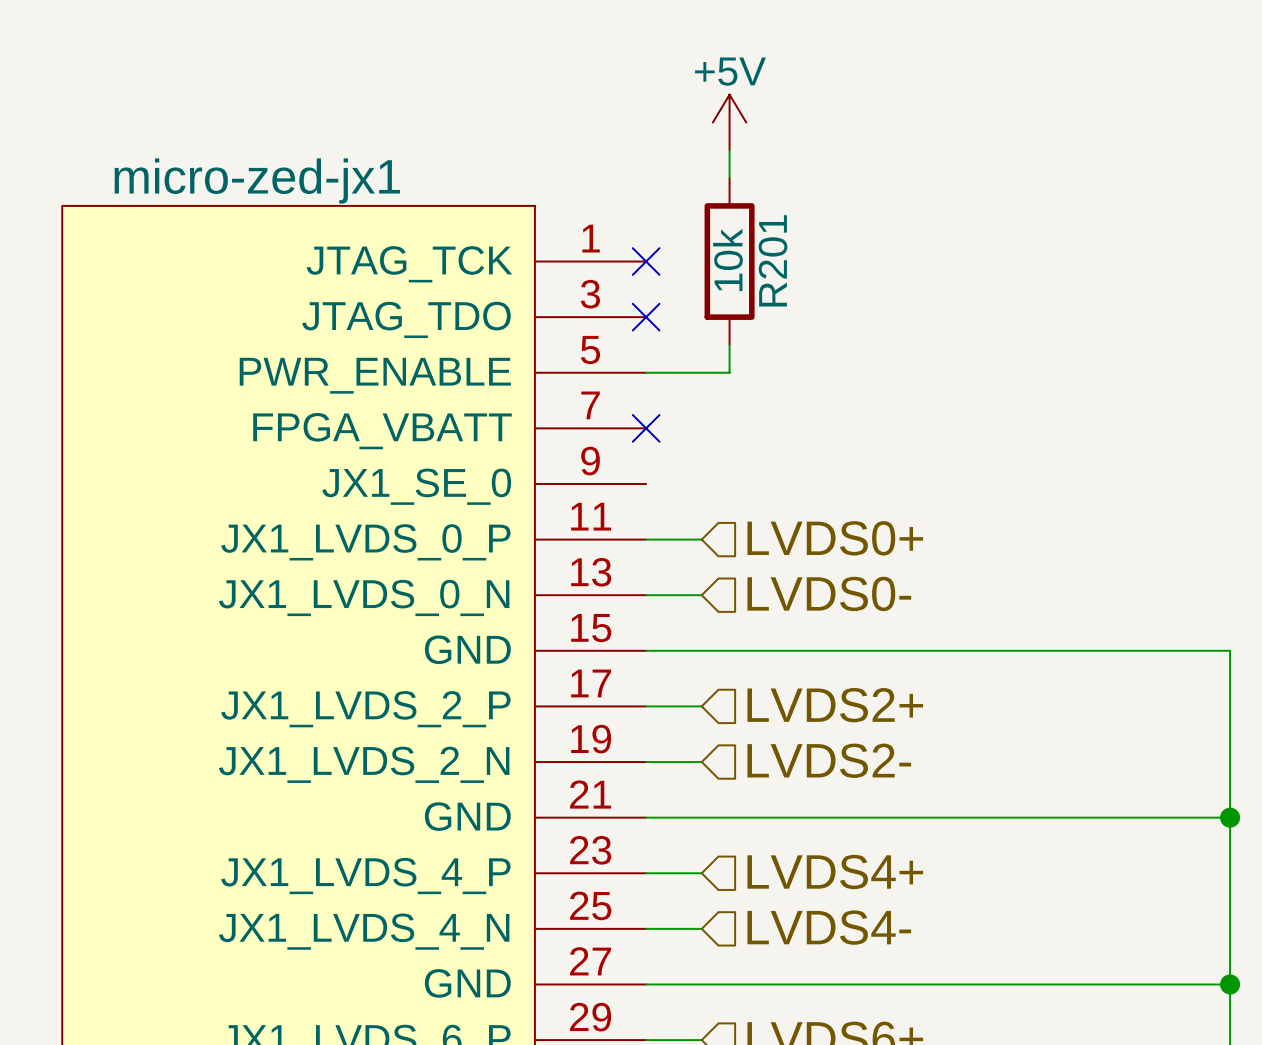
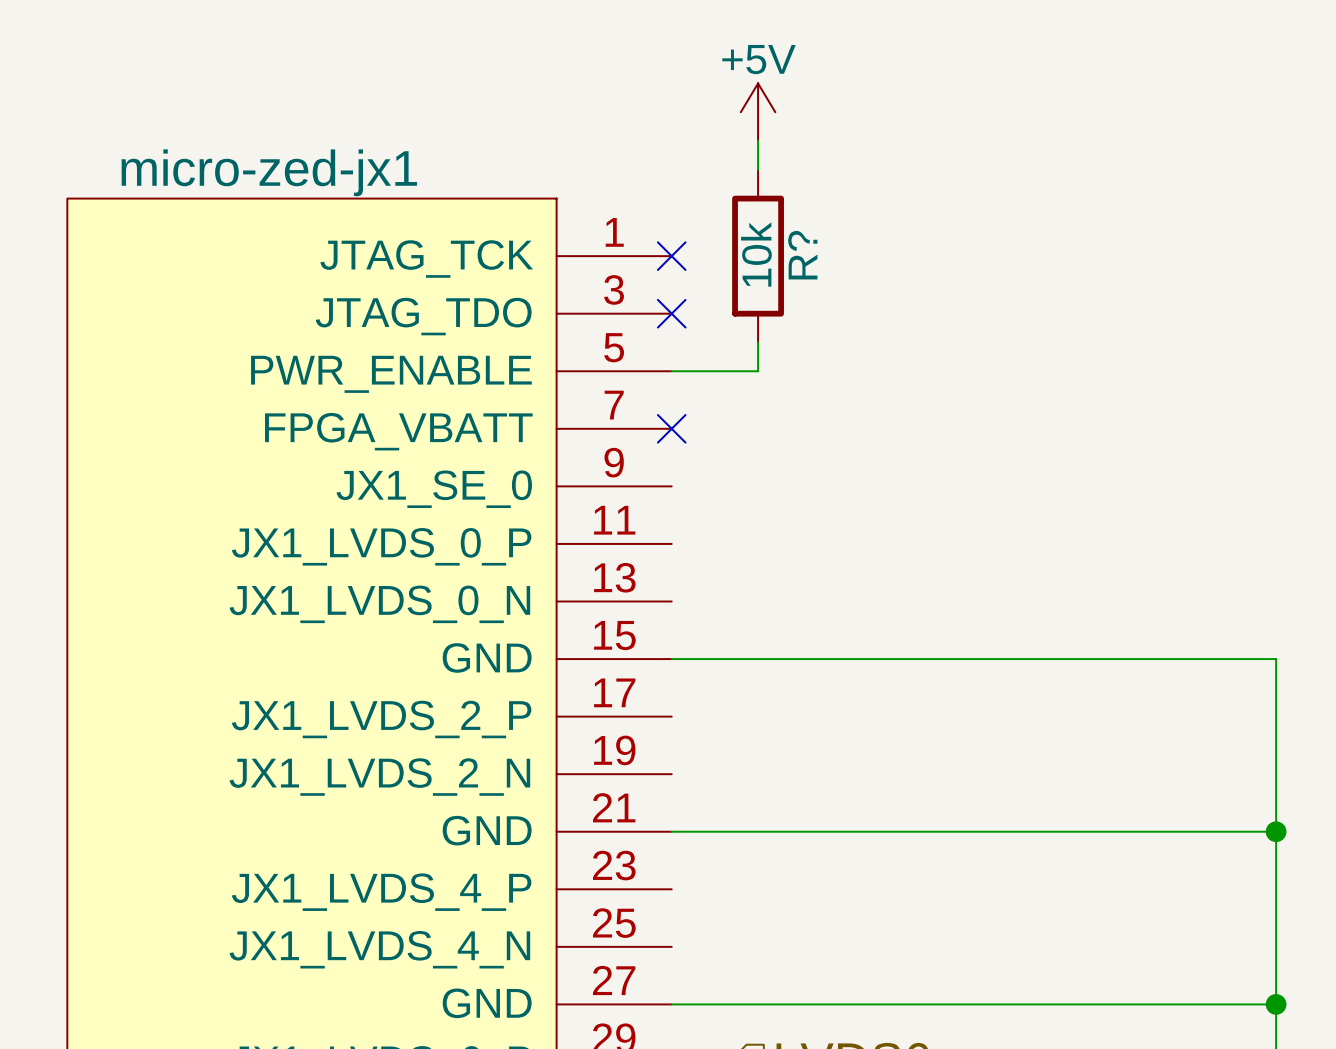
R201 name: R201 (773, 260) -> R? (802, 255)
hierarchical label: LVDS0+ (835, 538) -> none
wire: (646, 539) (701, 539) -> none
hierarchical label: LVDS0- (829, 593) -> none
wire: (646, 595) (701, 595) -> none
hierarchical label: LVDS2+ (835, 705) -> none
wire: (646, 706) (701, 706) -> none
hierarchical label: LVDS2- (829, 760) -> none
wire: (646, 762) (701, 762) -> none
hierarchical label: LVDS4+ (835, 871) -> none
wire: (646, 873) (701, 873) -> none
hierarchical label: LVDS4- (829, 927) -> none
wire: (646, 928) (701, 928) -> none

